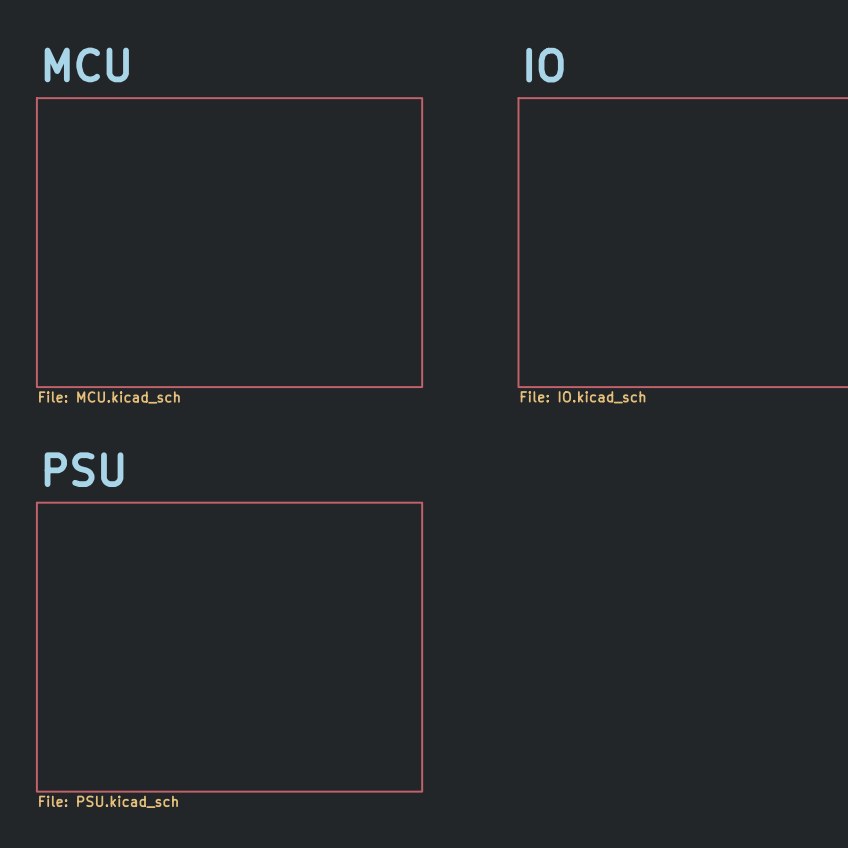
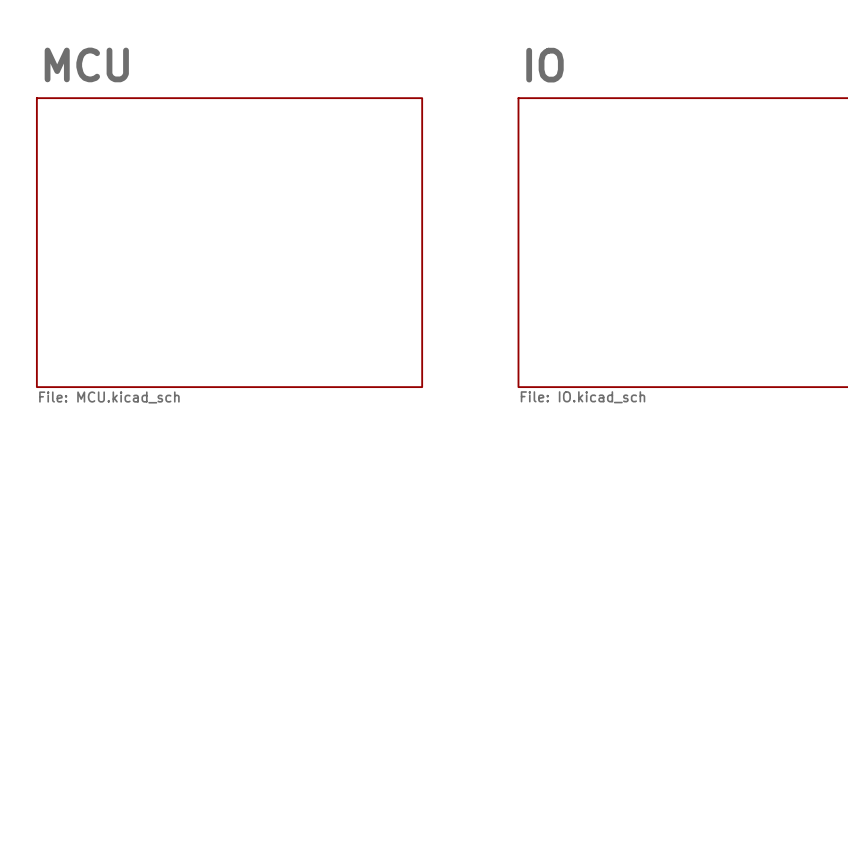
sheet PSU: File: PSU.kicad_sch (229, 647) -> none

